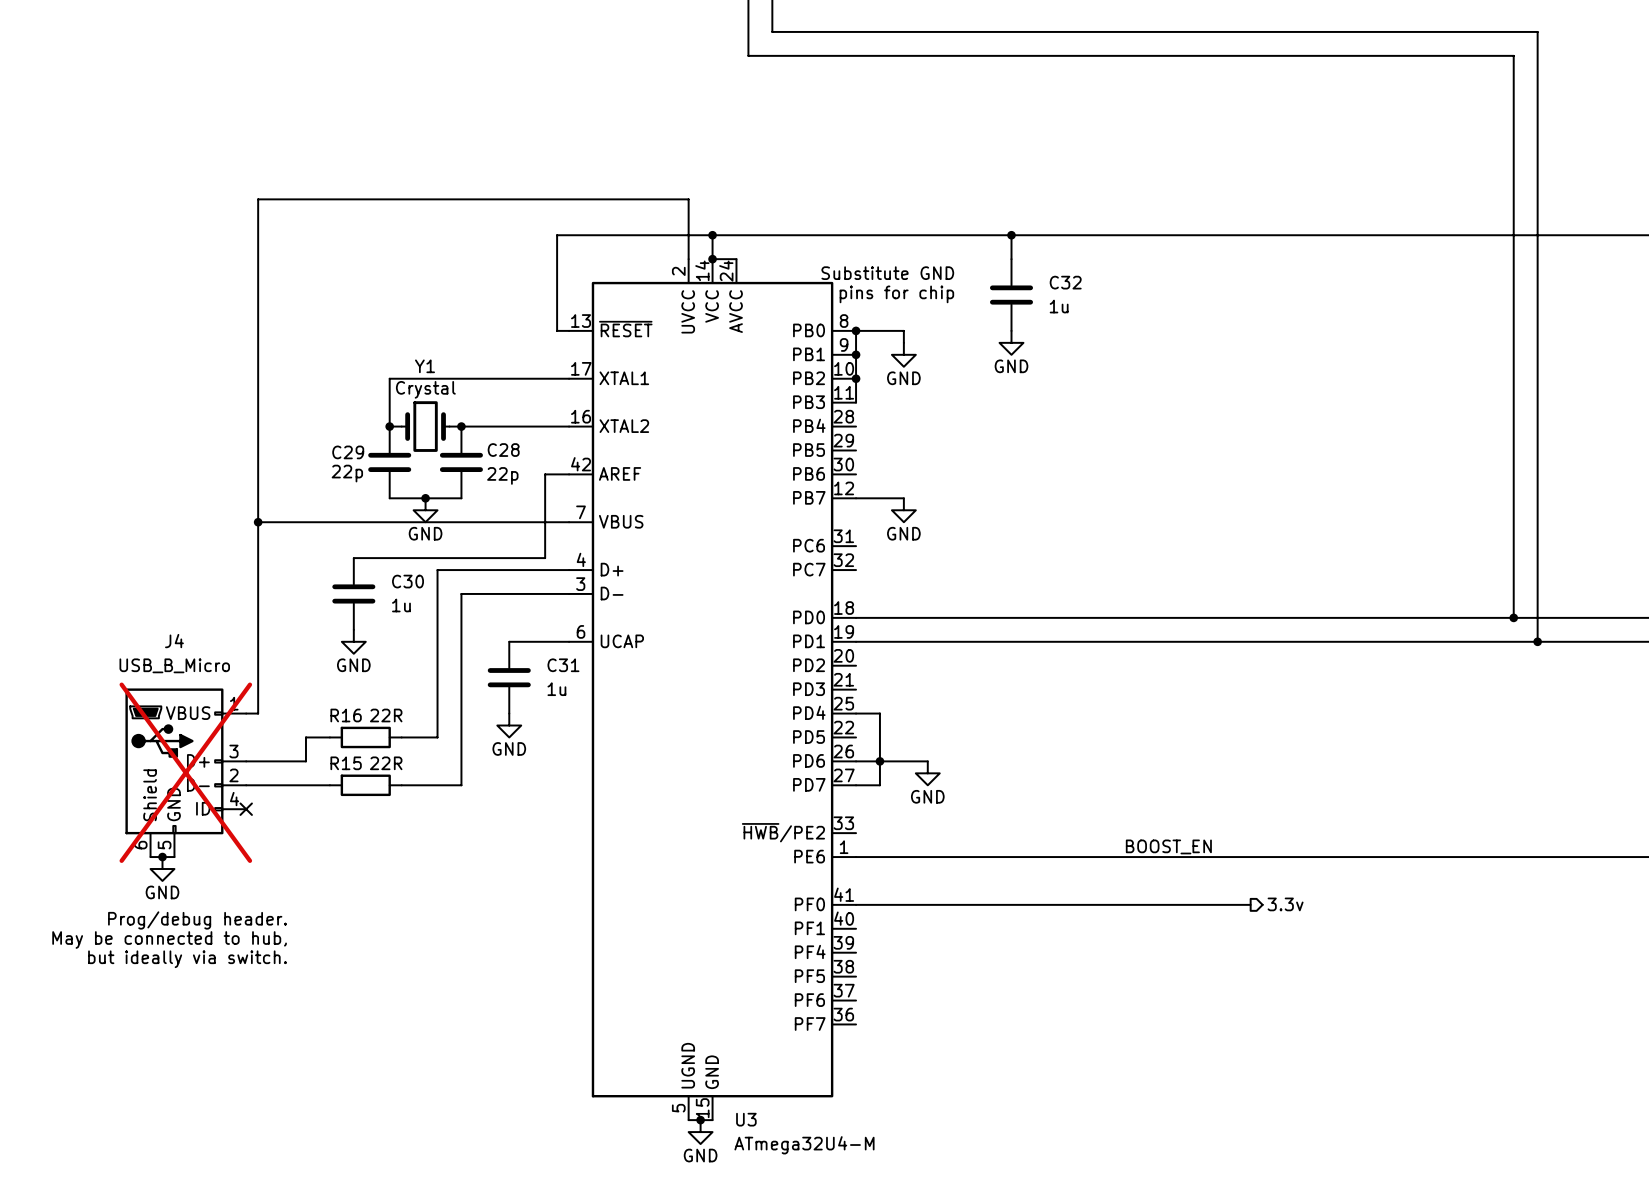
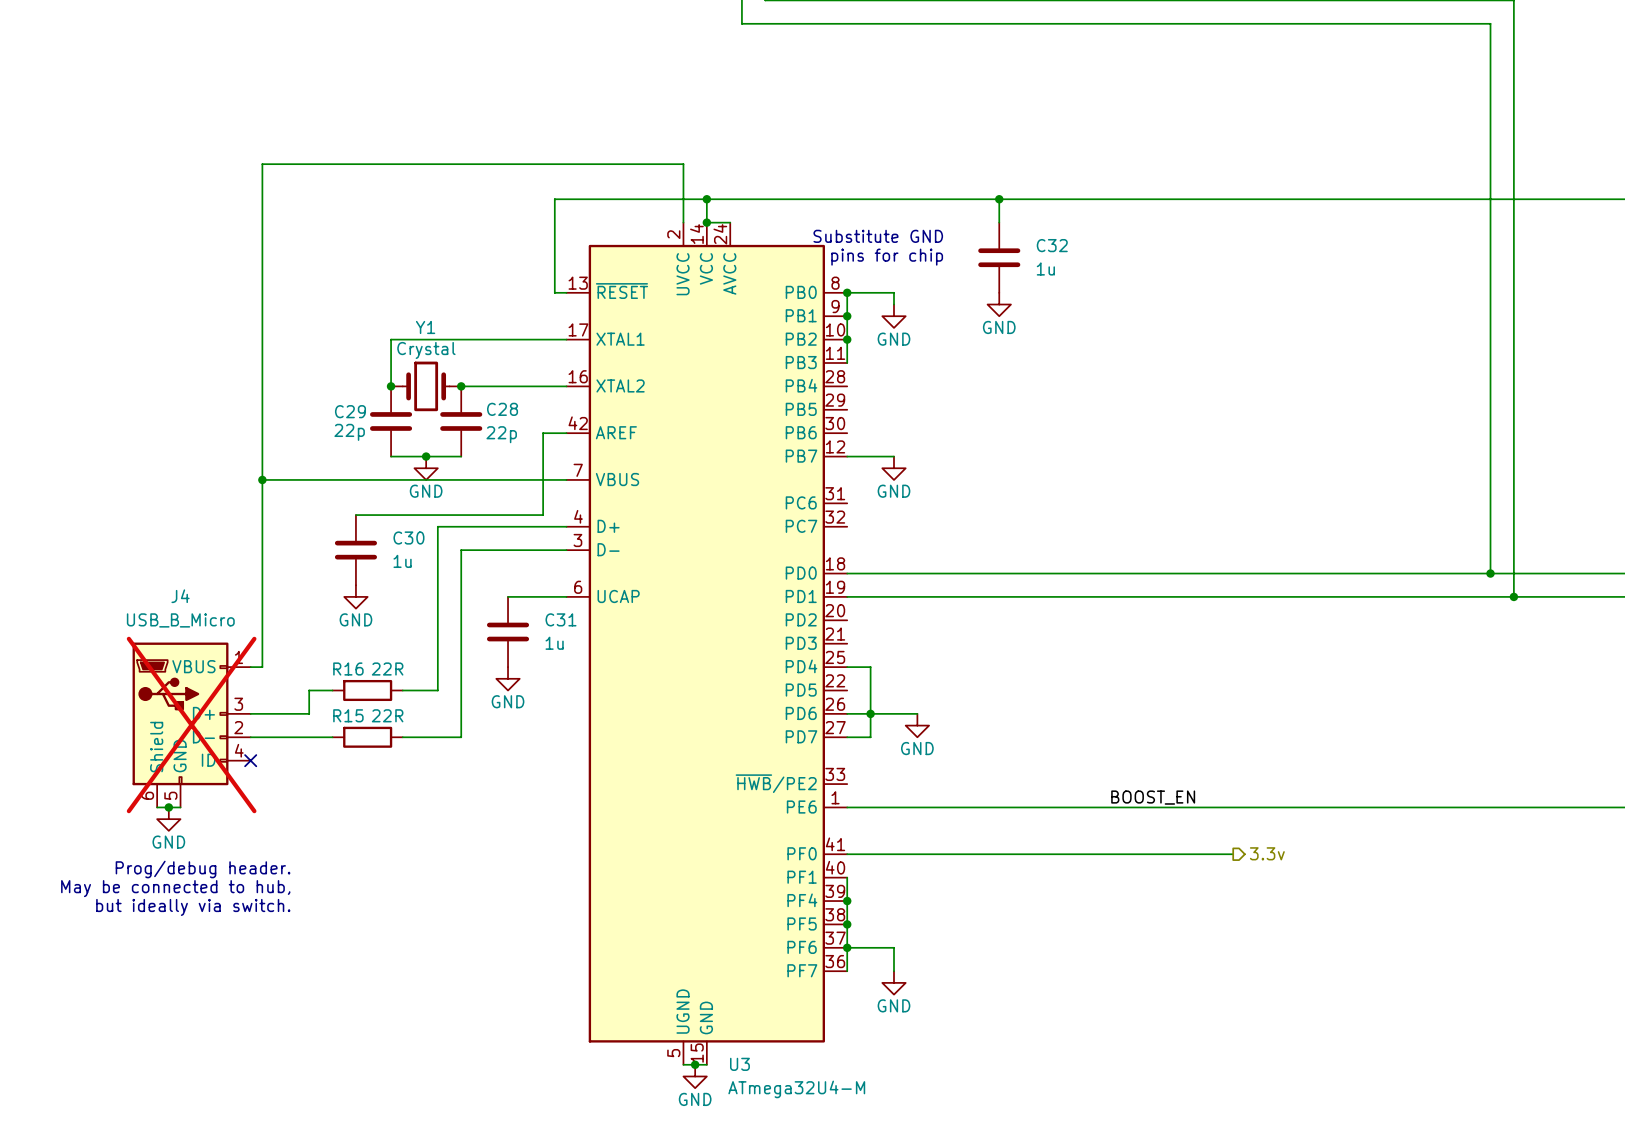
wire: none -> (847, 877) (847, 971)
junction: none -> (847, 901)
junction: none -> (847, 924)
wire: none -> (847, 947) (893, 947) (893, 971)
junction: none -> (847, 947)
power symbol: none -> GND (893, 982)

